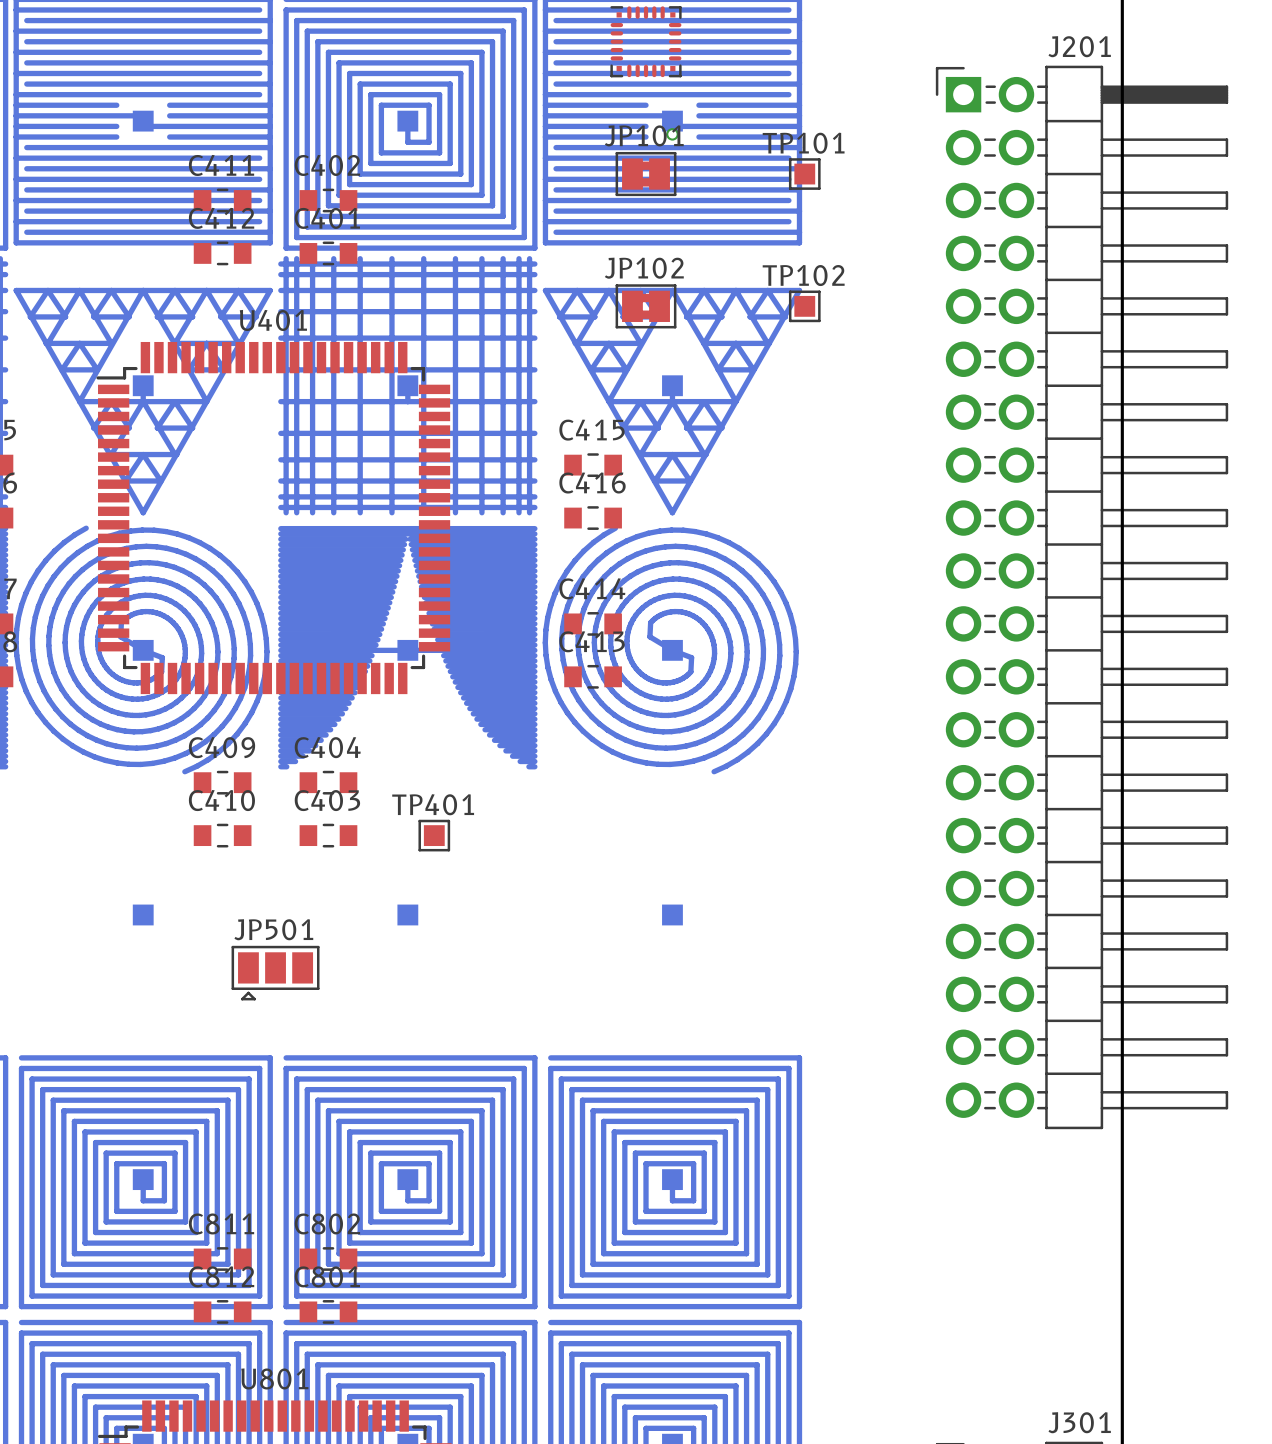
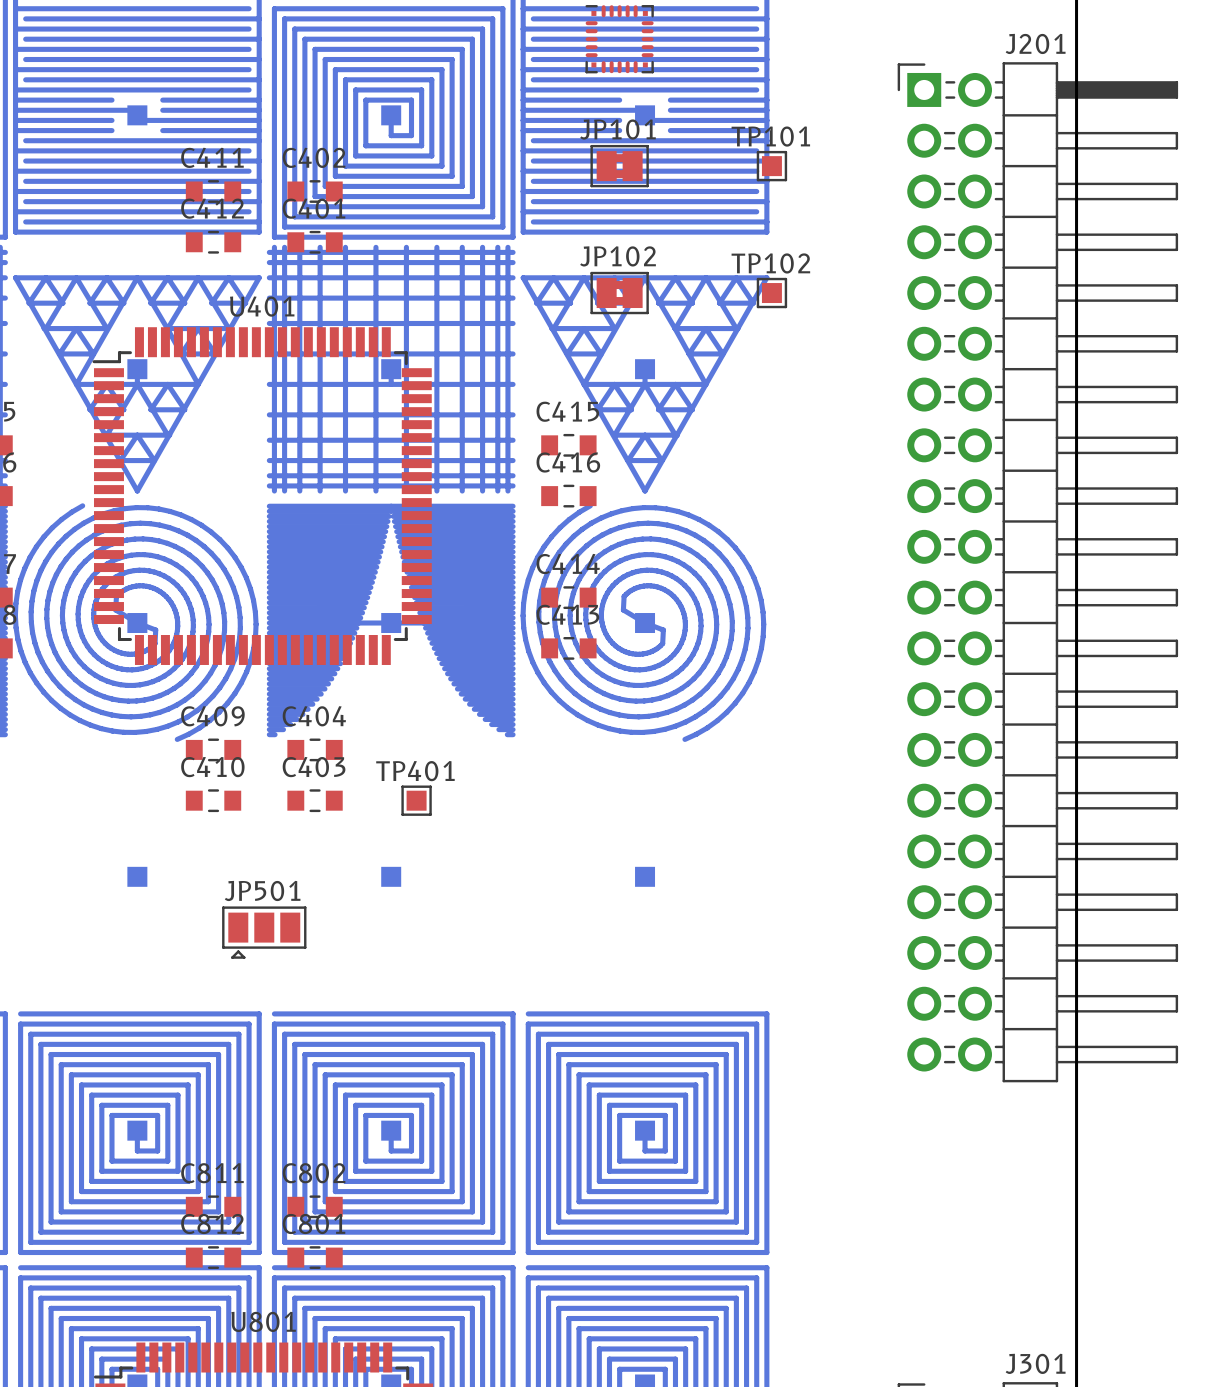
via: (672, 134) -> none

